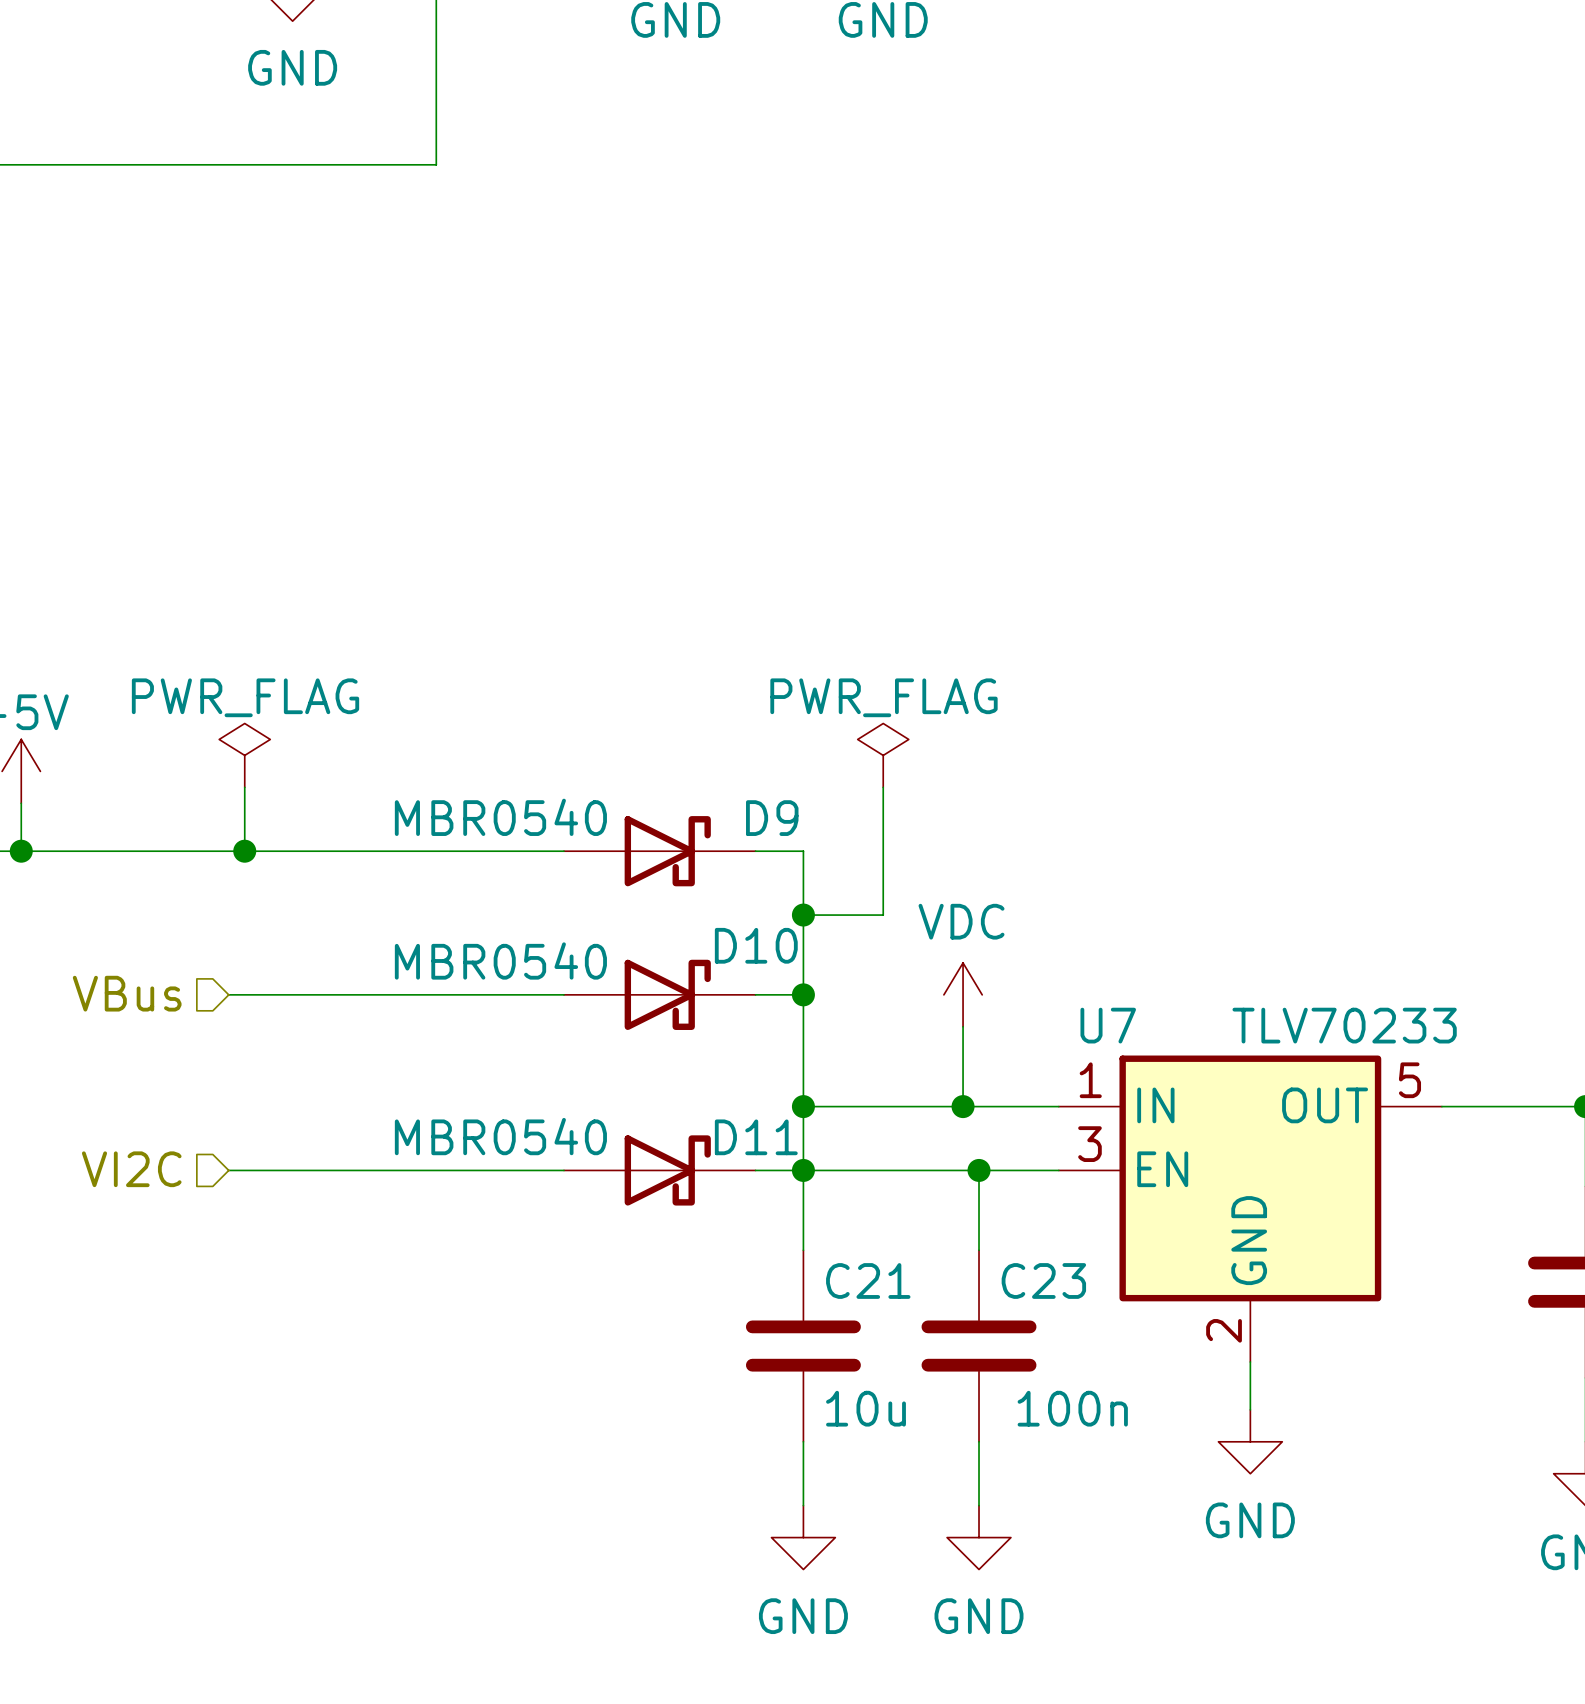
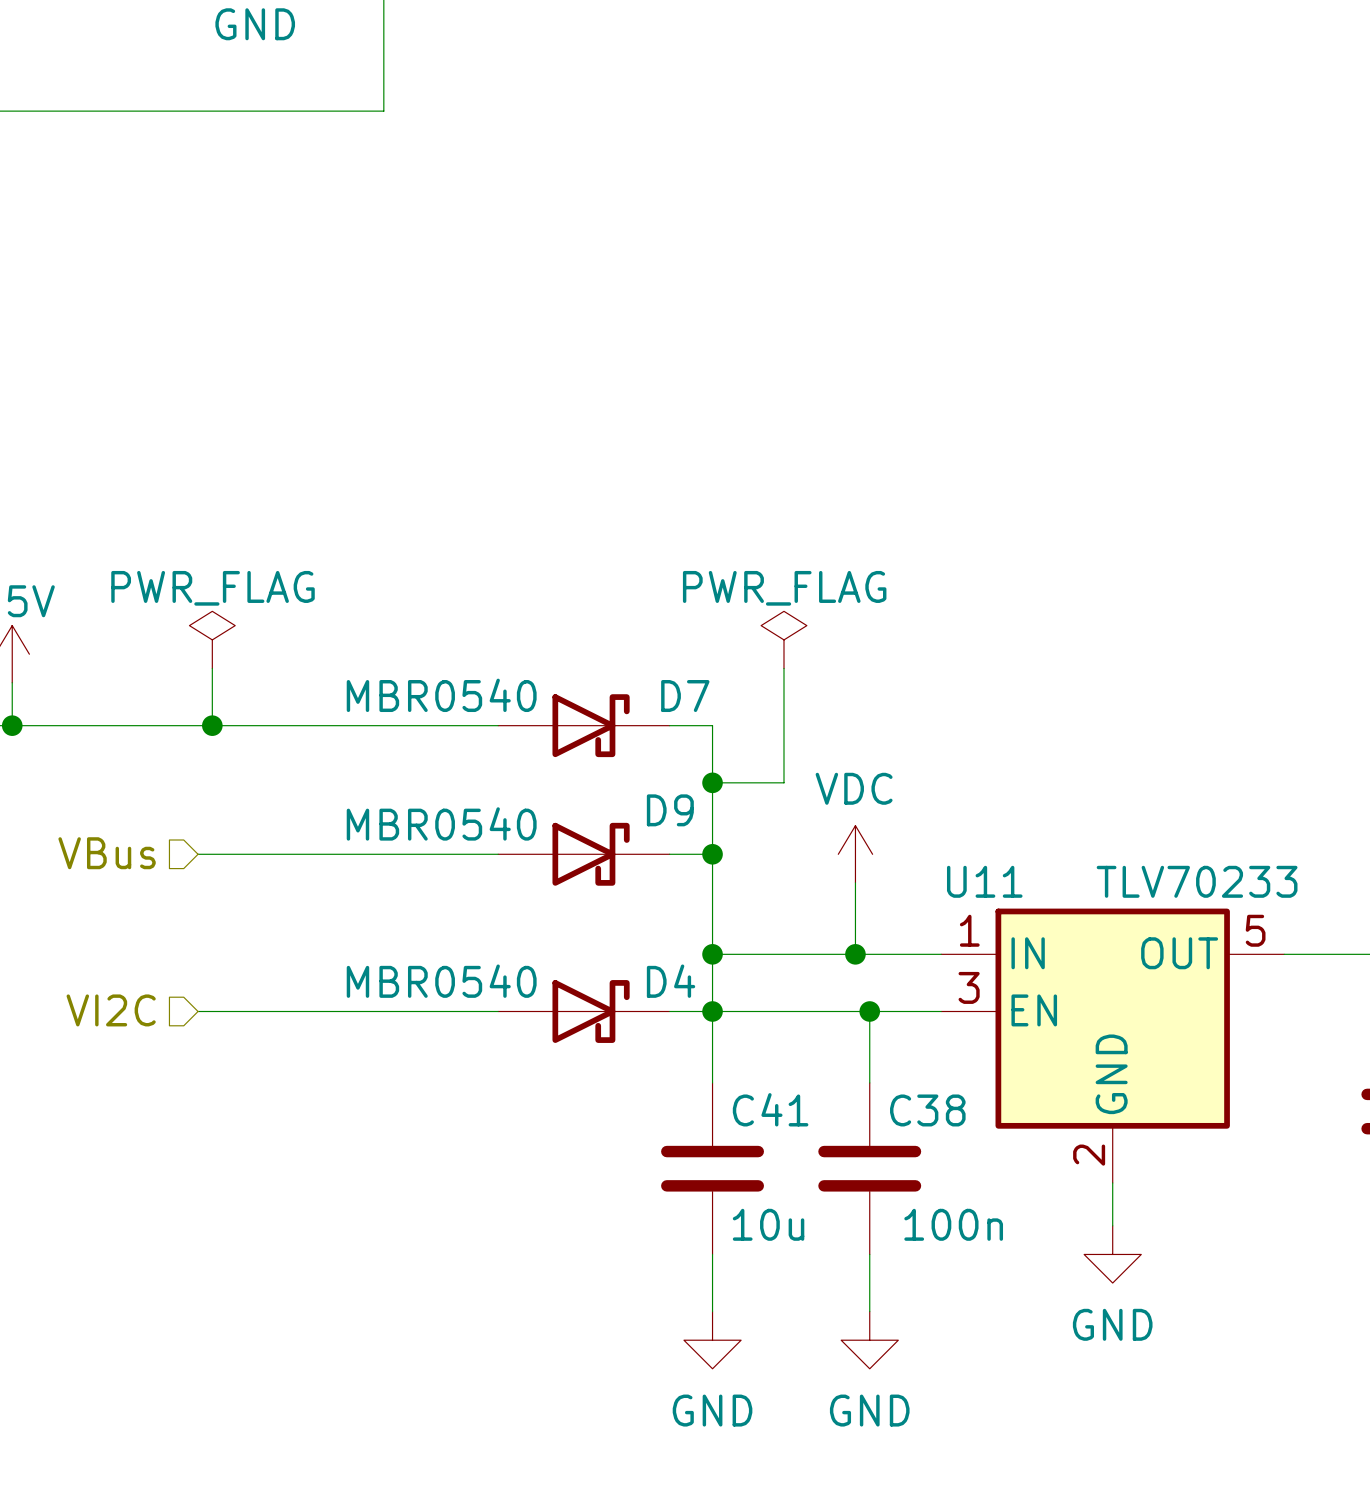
D9 name: D9 (772, 818) -> D7 (685, 696)
D10 name: D10 (756, 945) -> D9 (670, 810)
U7 name: U7 (1108, 1025) -> U11 (984, 881)
D11 name: D11 (756, 1137) -> D4 (671, 981)
C21 name: C21 (868, 1280) -> C41 (770, 1109)
C23 name: C23 (1043, 1280) -> C38 (927, 1110)

